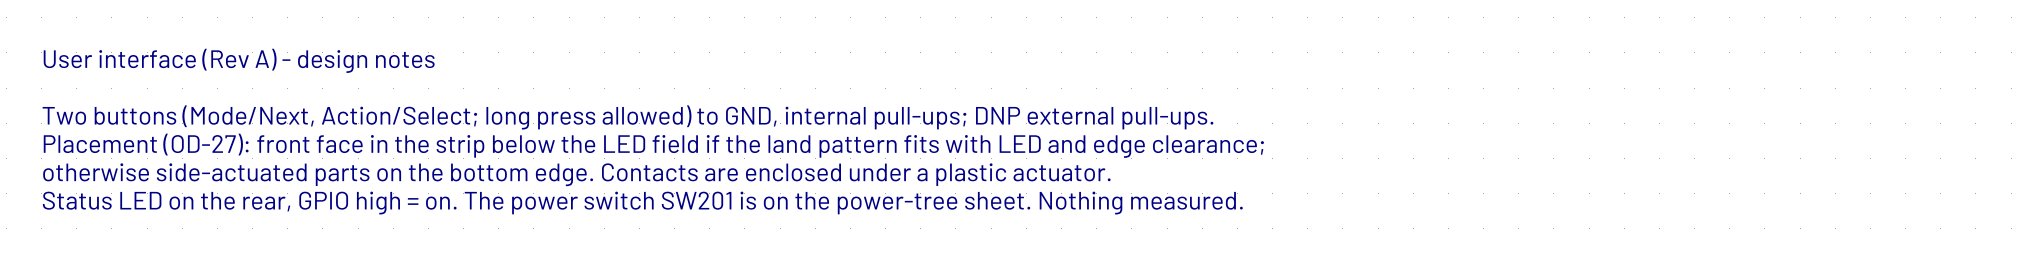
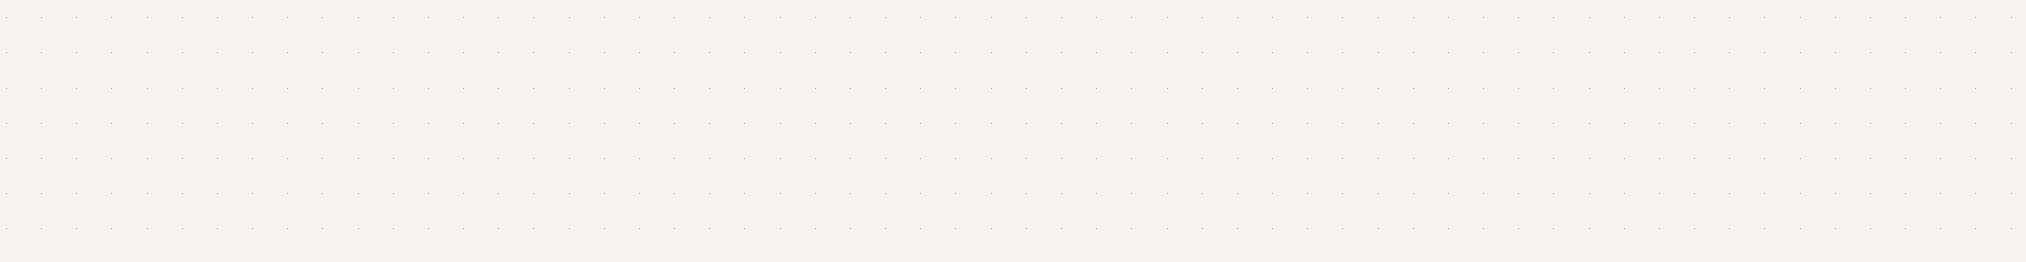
text: User interface (Rev A) - design notes (239, 60) -> none
text: Two buttons (Mode/Next, Action/Select; long press allowed) to GND, internal pull-ups; DNP external pull-ups. (628, 117) -> none
text: Placement (OD-27): front face in the strip below the LED field if the land pattern fits with LED and edge clearance; (653, 145) -> none
text: otherwise side-actuated parts on the bottom edge. Contacts are enclosed under a plastic actuator. (576, 174) -> none
text: Status LED on the rear, GPIO high = on. The power switch SW201 is on the power-tree sheet. Nothing measured. (642, 203) -> none

